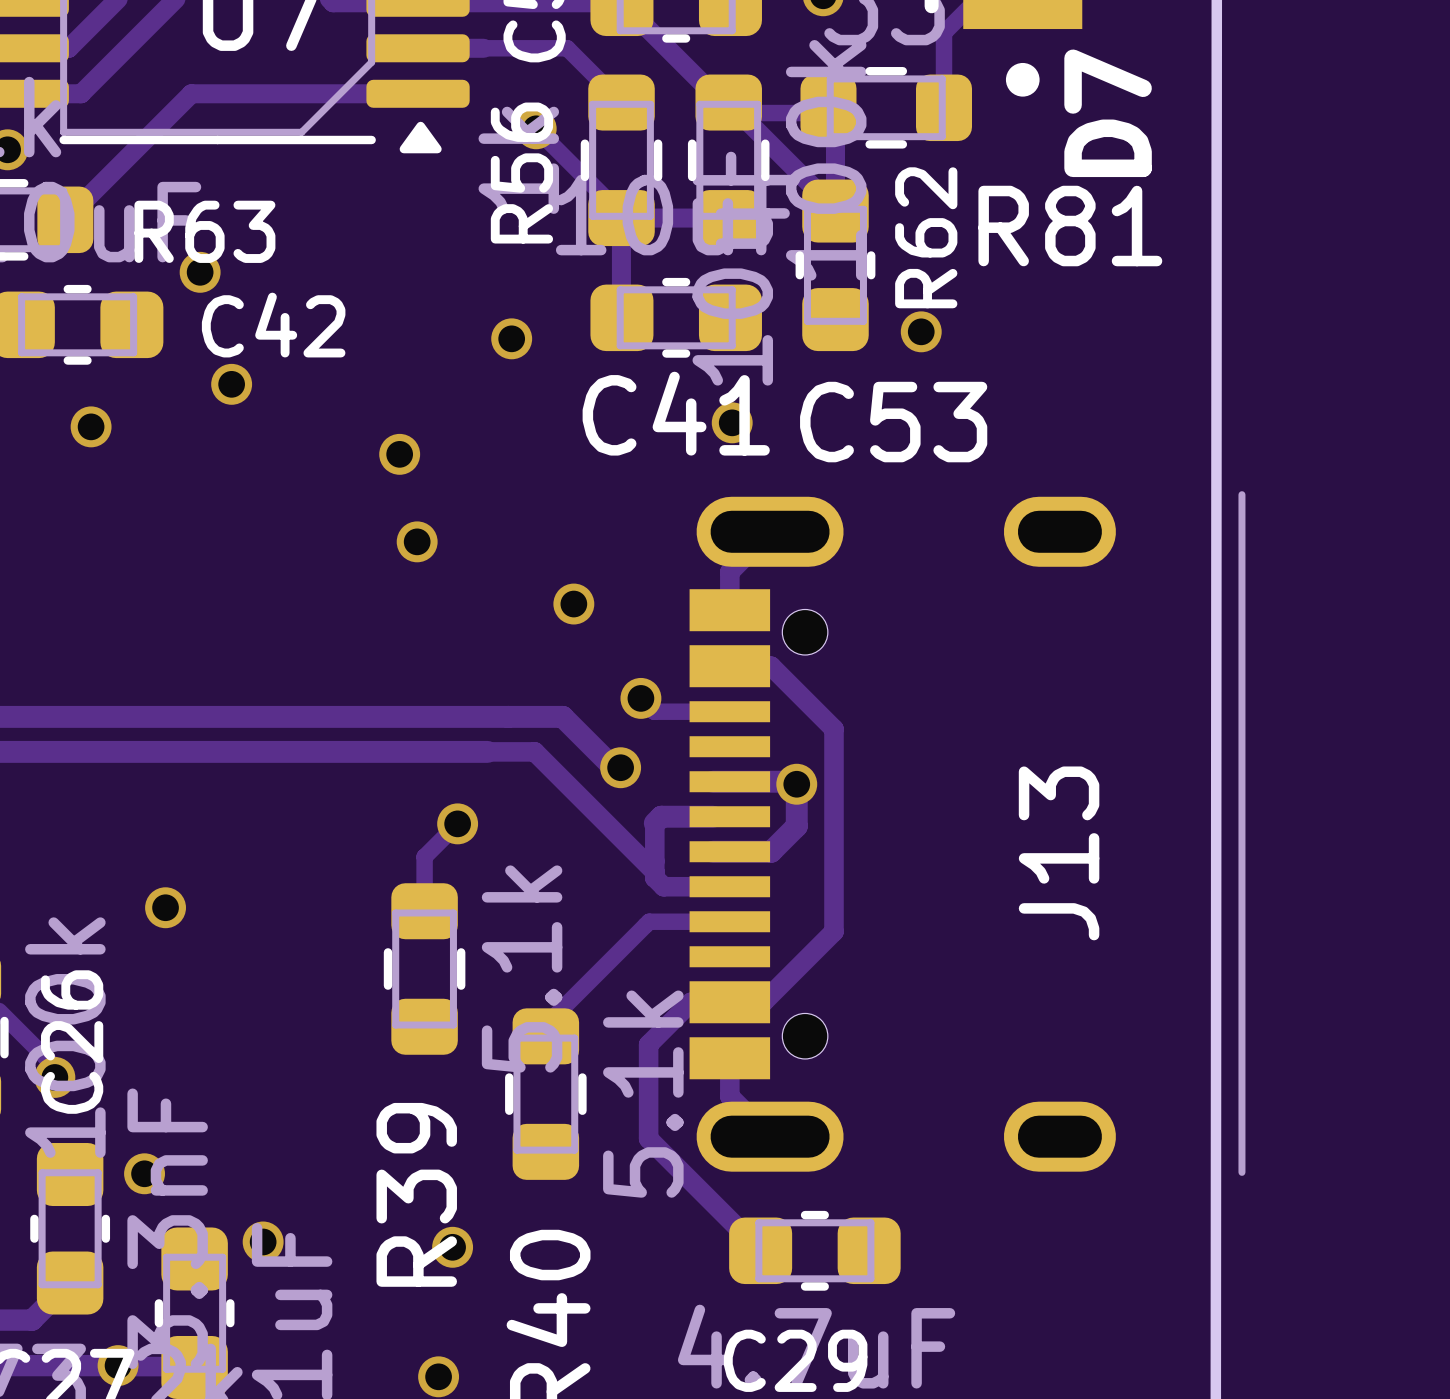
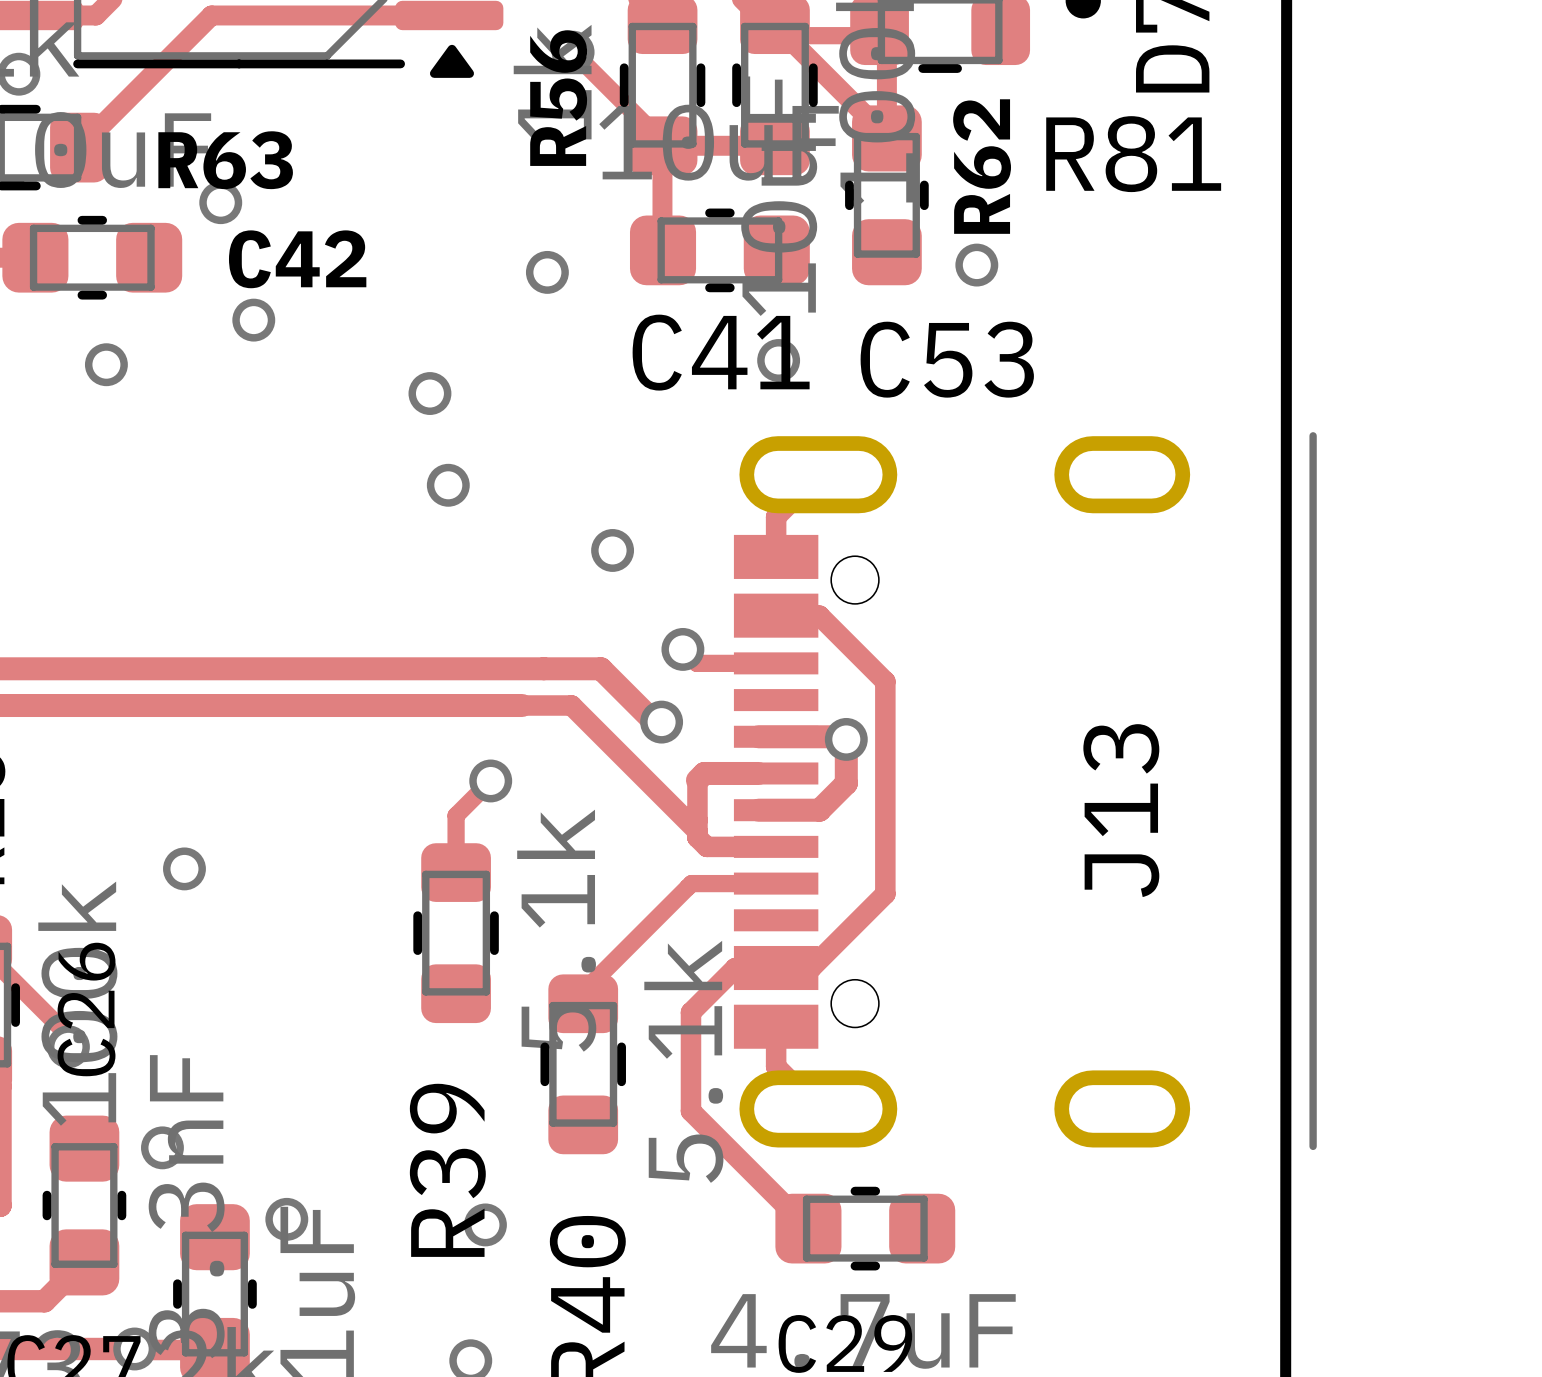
J13 footprint: [689, 491, 1246, 1176] -> [733, 432, 1317, 1151]

